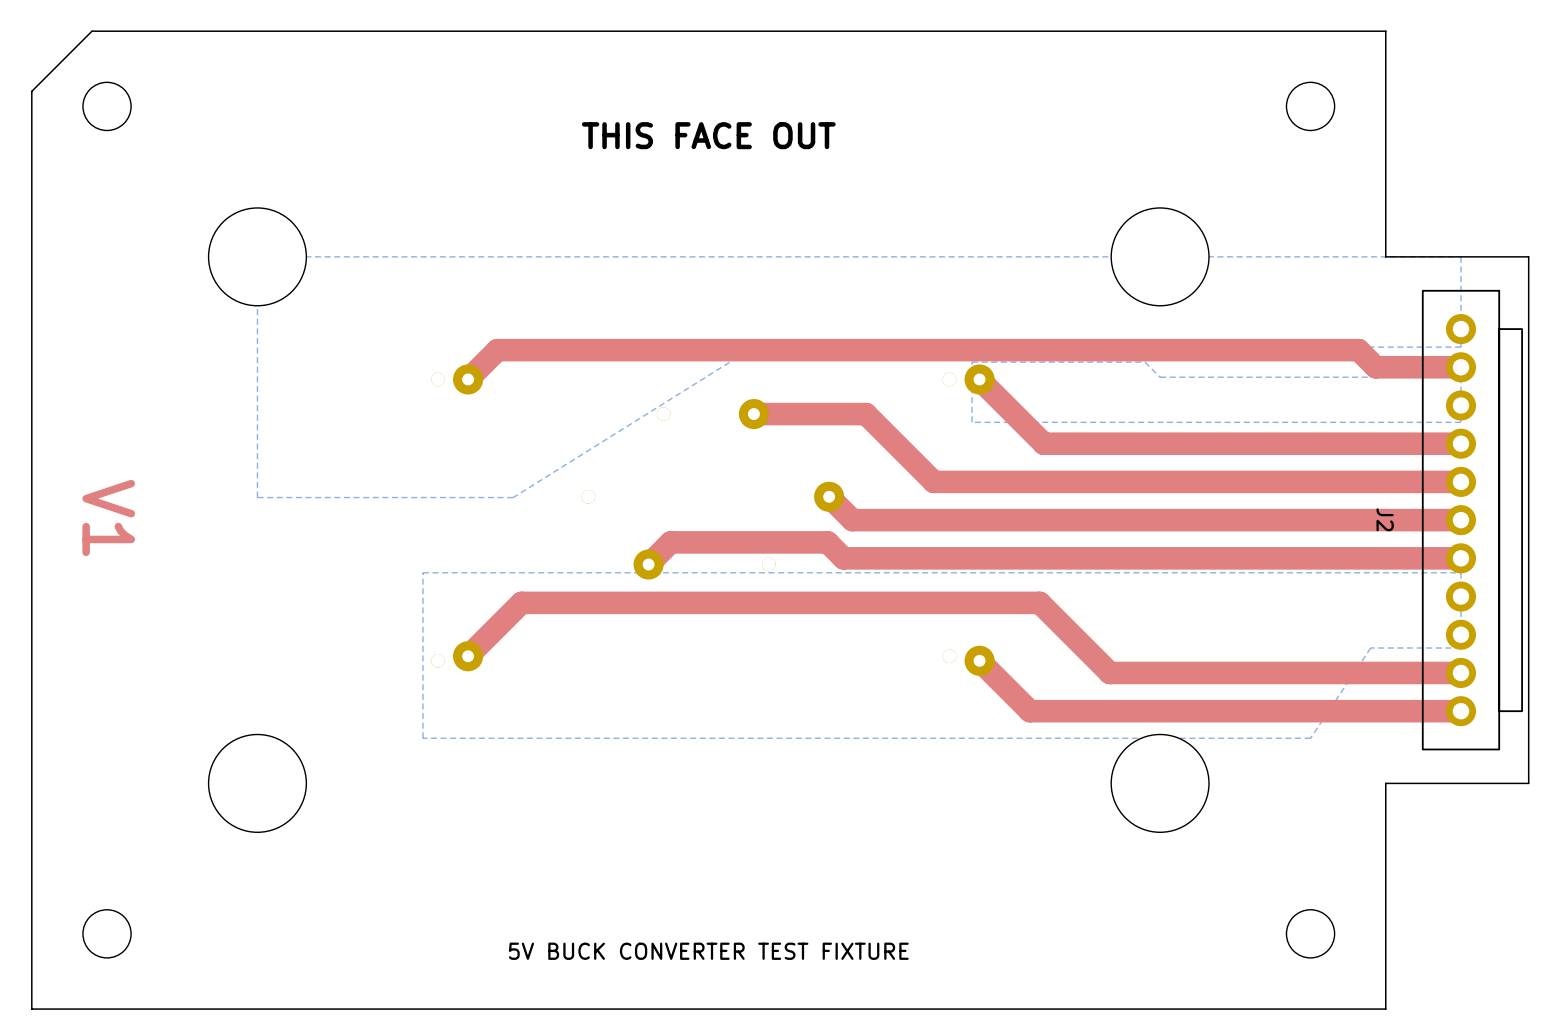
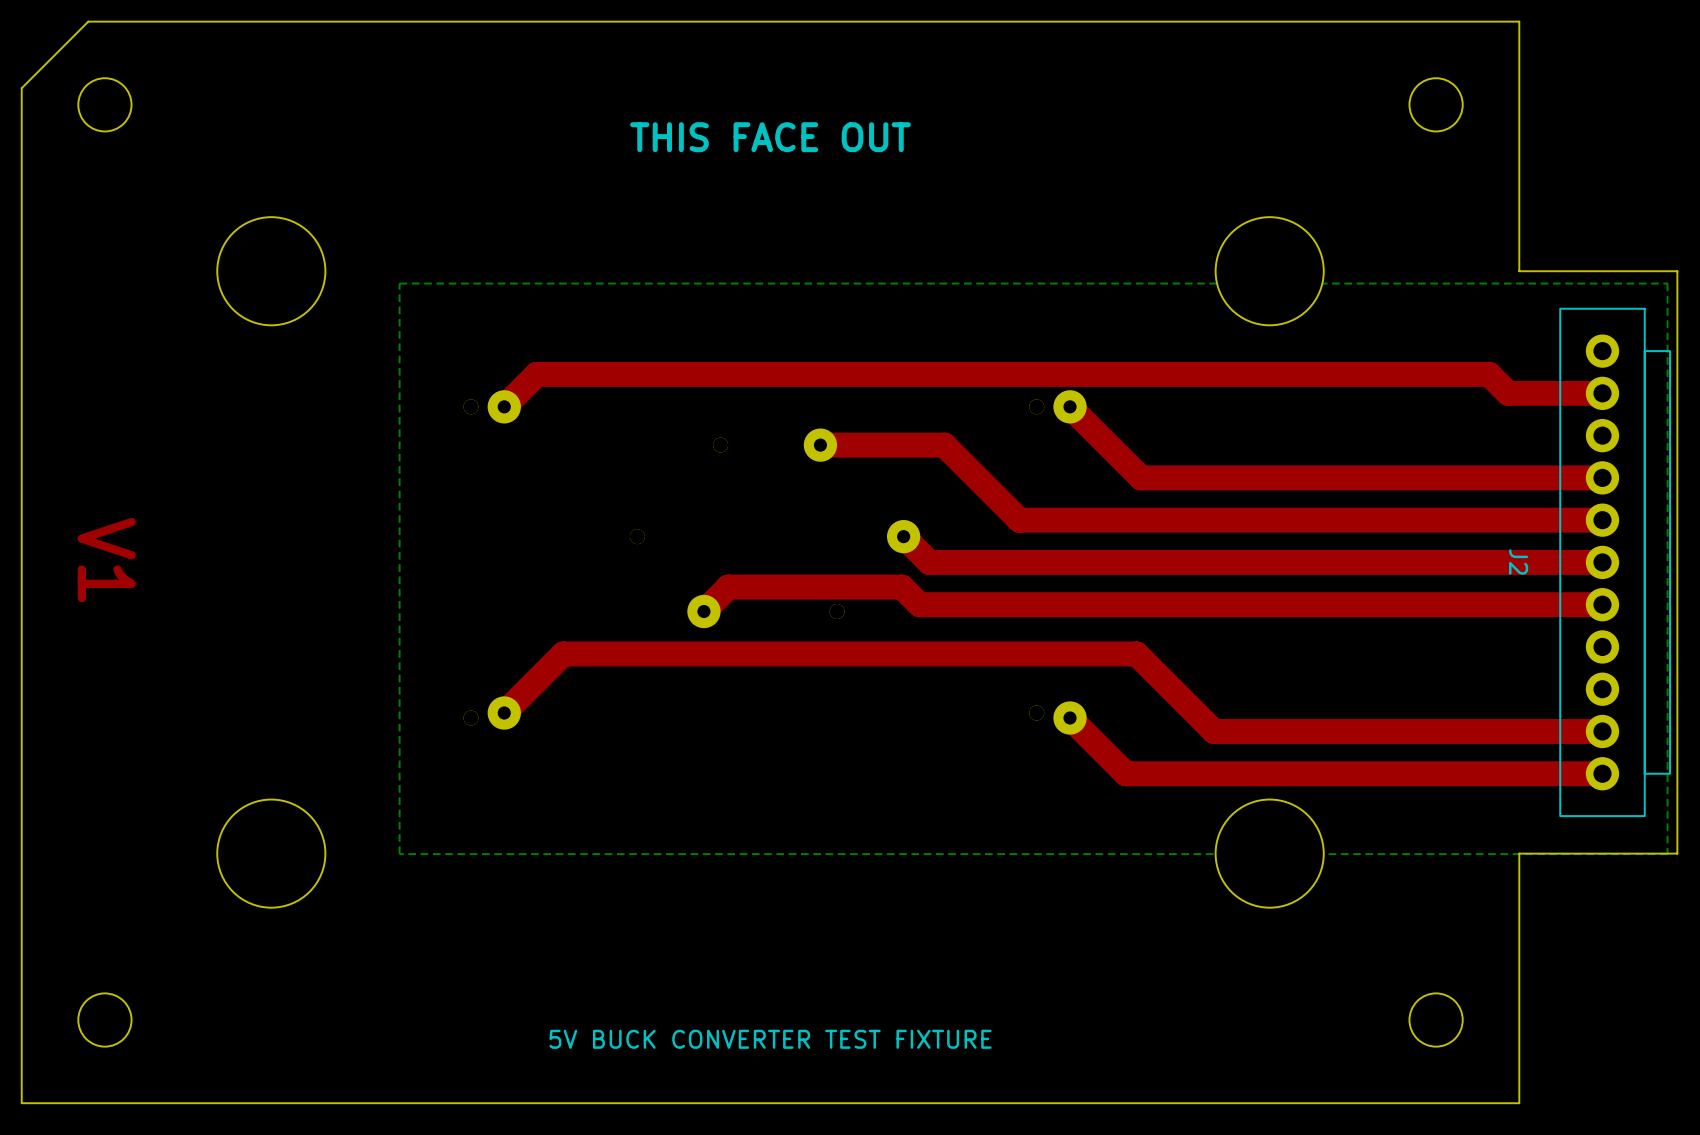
bottom zone outline: (257, 256) (257, 497) (513, 497) (753, 347) (1460, 347) (1460, 256) (257, 256) -> none
bottom zone outline: none -> (399, 283) (399, 854) (1667, 854) (1667, 283) (399, 283)
bottom zone outline: (972, 362) (972, 422) (1460, 422) (1460, 377) (1160, 377) (1145, 362) (972, 362) -> none
bottom zone outline: (422, 572) (422, 738) (1310, 738) (1370, 648) (1460, 648) (1460, 572) (422, 572) -> none

